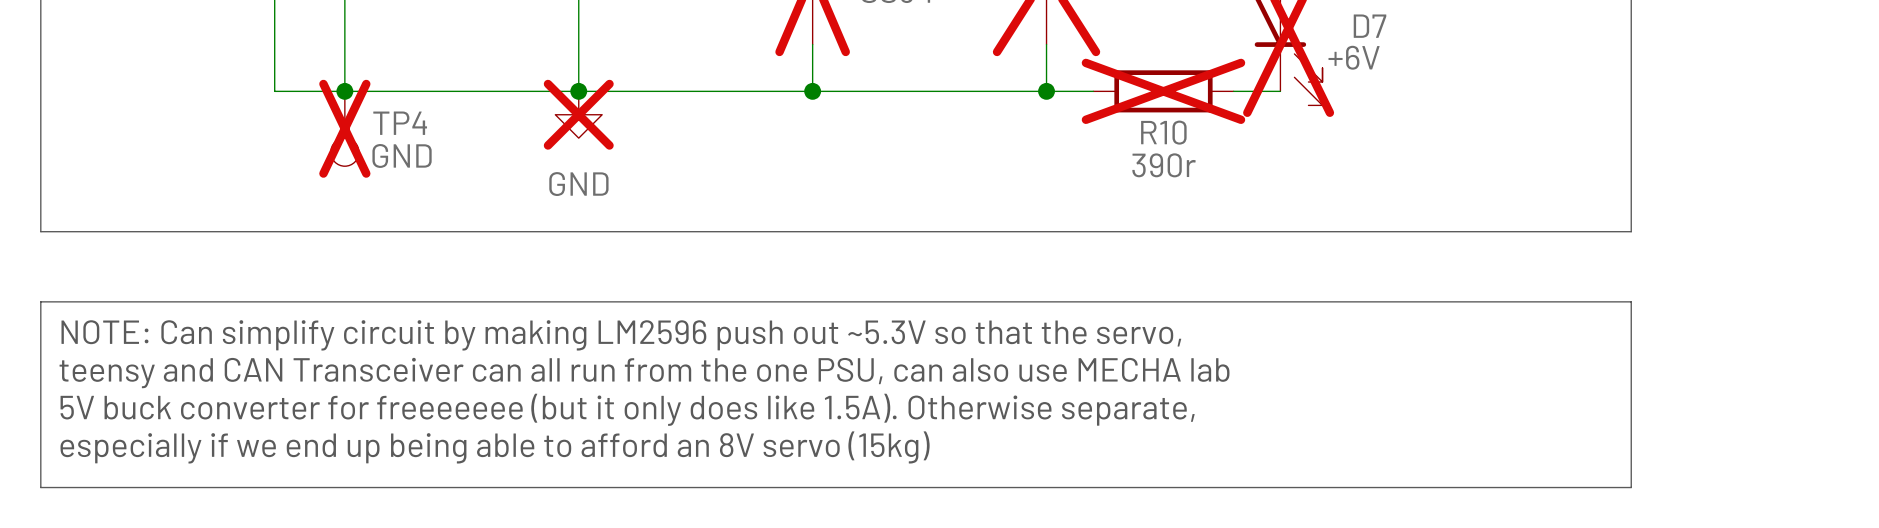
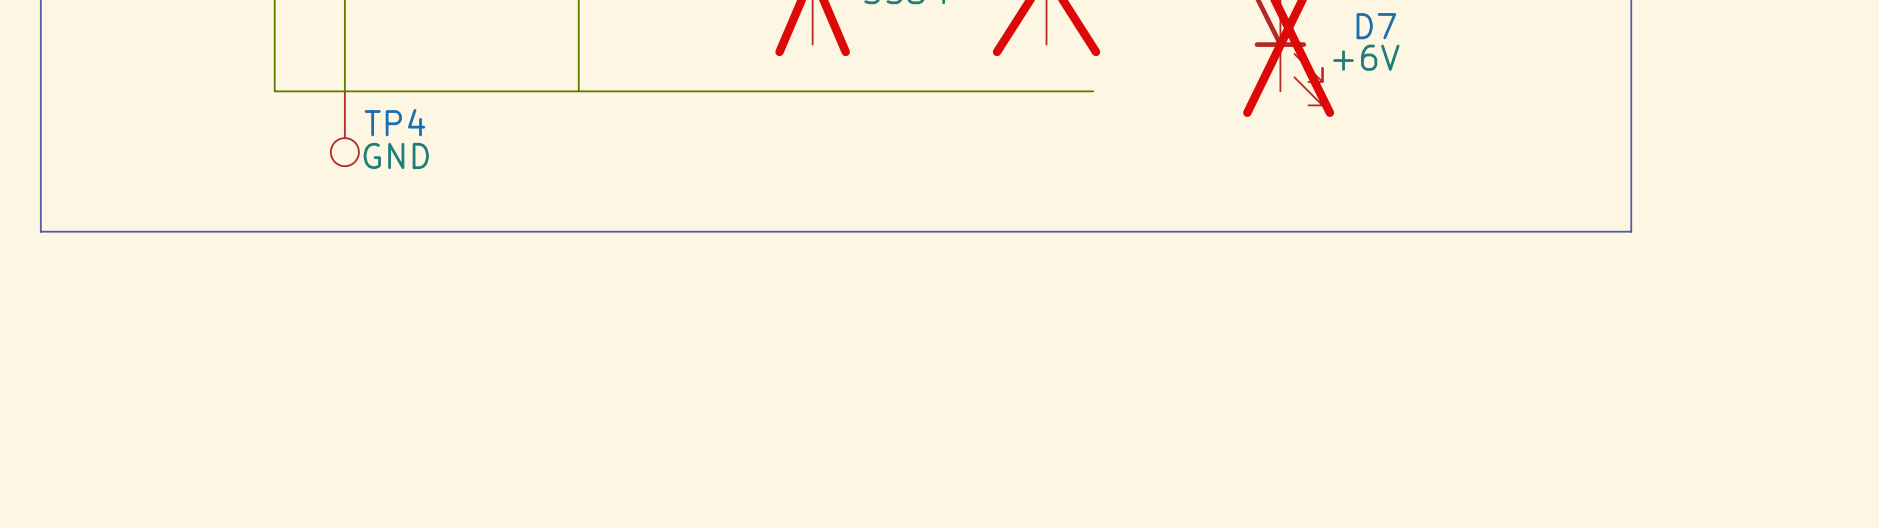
wire: (812, 44) (812, 91) -> none
wire: (1046, 44) (1046, 91) -> none
junction: (344, 91) -> none
junction: (578, 91) -> none
junction: (812, 91) -> none
junction: (1046, 91) -> none
R10: 390r (1163, 91) -> none
wire: (1233, 91) (1280, 91) -> none
power symbol: GND (578, 114) -> none
TP4 do-not-place cross: (344, 128) -> none
line: (40, 301) (40, 487) (1631, 487) (1631, 301) (40, 301) -> none
text: NOTE: Can simplify circuit by making LM2596 push out ~5.3V so that the servo, (621, 335) -> none
text: teensy and CAN Transceiver can all run from the one PSU, can also use MECHA lab (644, 373) -> none
text: 5V buck converter for freeeeeee (but it only does like 1.5A). Otherwise separate, (627, 409) -> none
text: especially if we end up being able to afford an 8V servo (15kg) (495, 447) -> none

